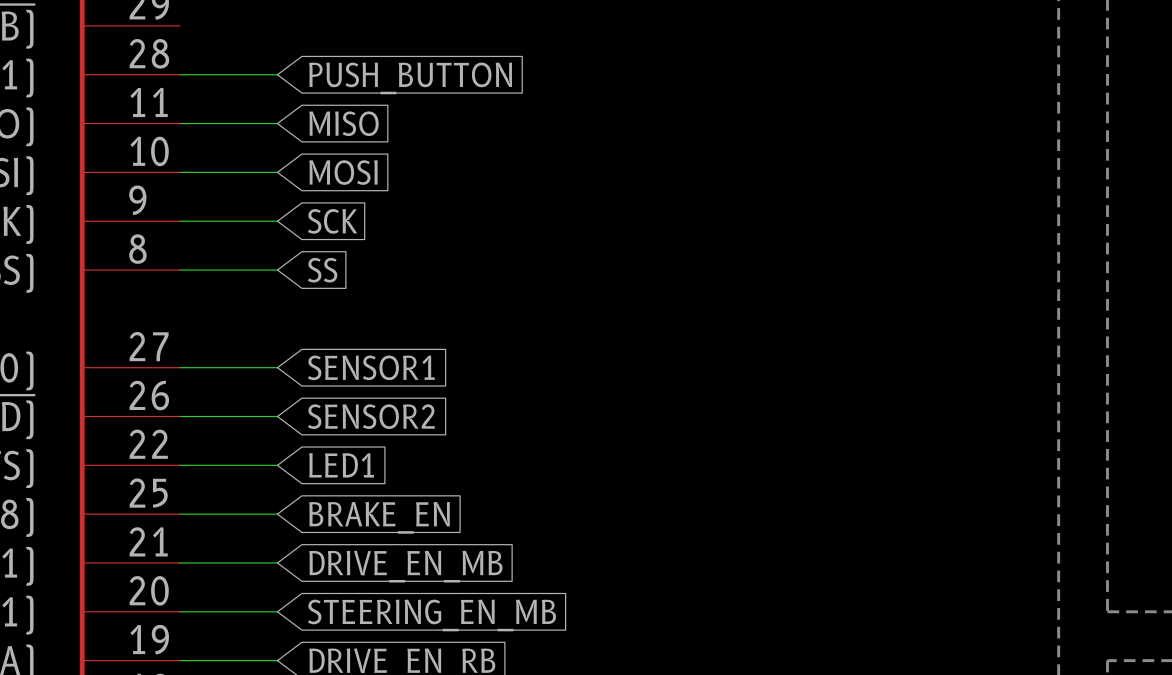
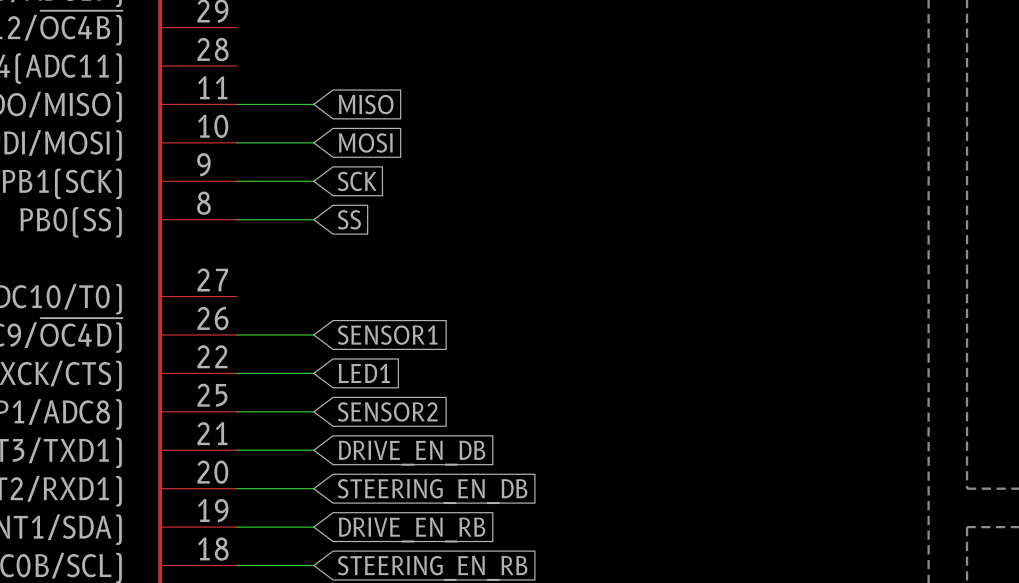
wire: (179, 74) (277, 74) -> none
global label: PUSH_BUTTON (410, 78) -> none
wire: (179, 367) (277, 367) -> none
global label: SENSOR1 (371, 367) -> none
global label: SENSOR2 (371, 416) -> SENSOR1 (387, 335)
global label: BRAKE_EN (379, 517) -> SENSOR2 (387, 411)
global label: DRIVE_EN_MB (405, 566) -> DRIVE_EN_DB (412, 453)
global label: STEERING_EN_MB (431, 615) -> STEERING_EN_DB (432, 491)

